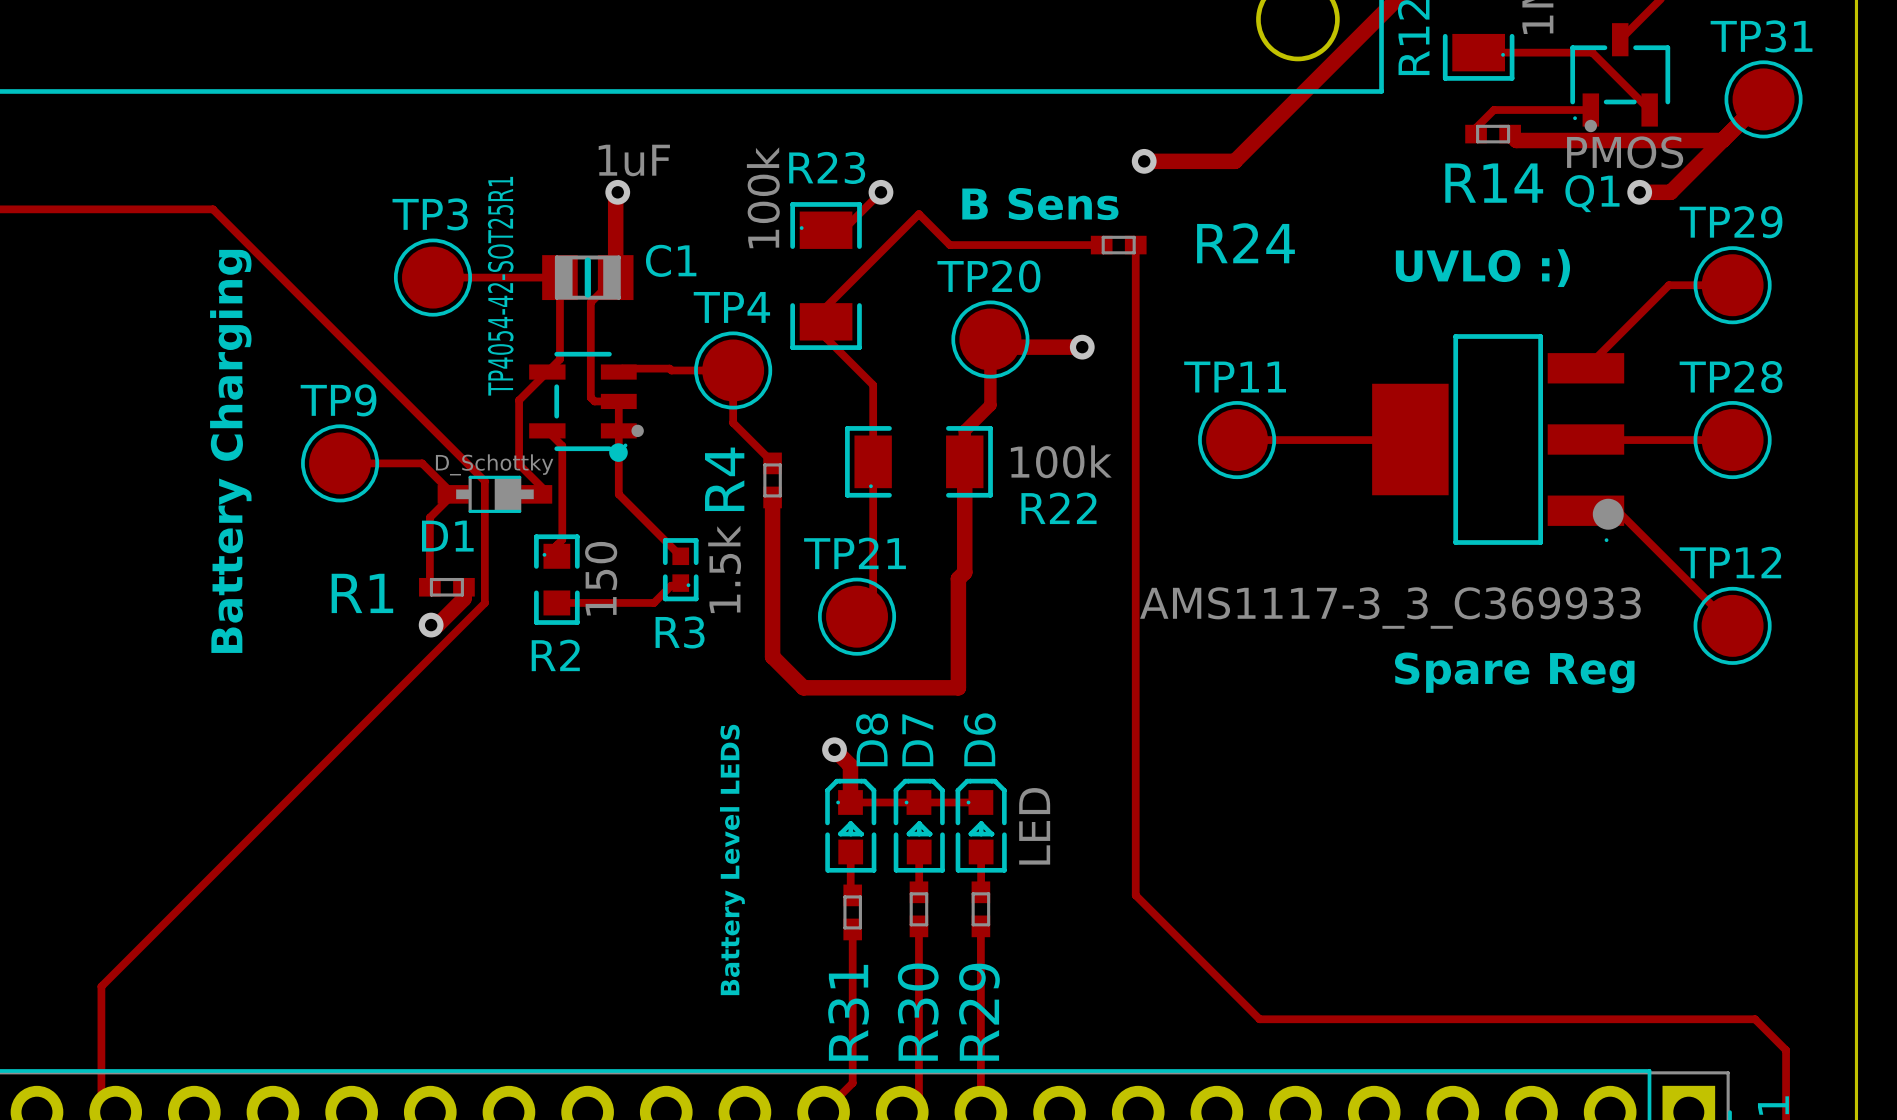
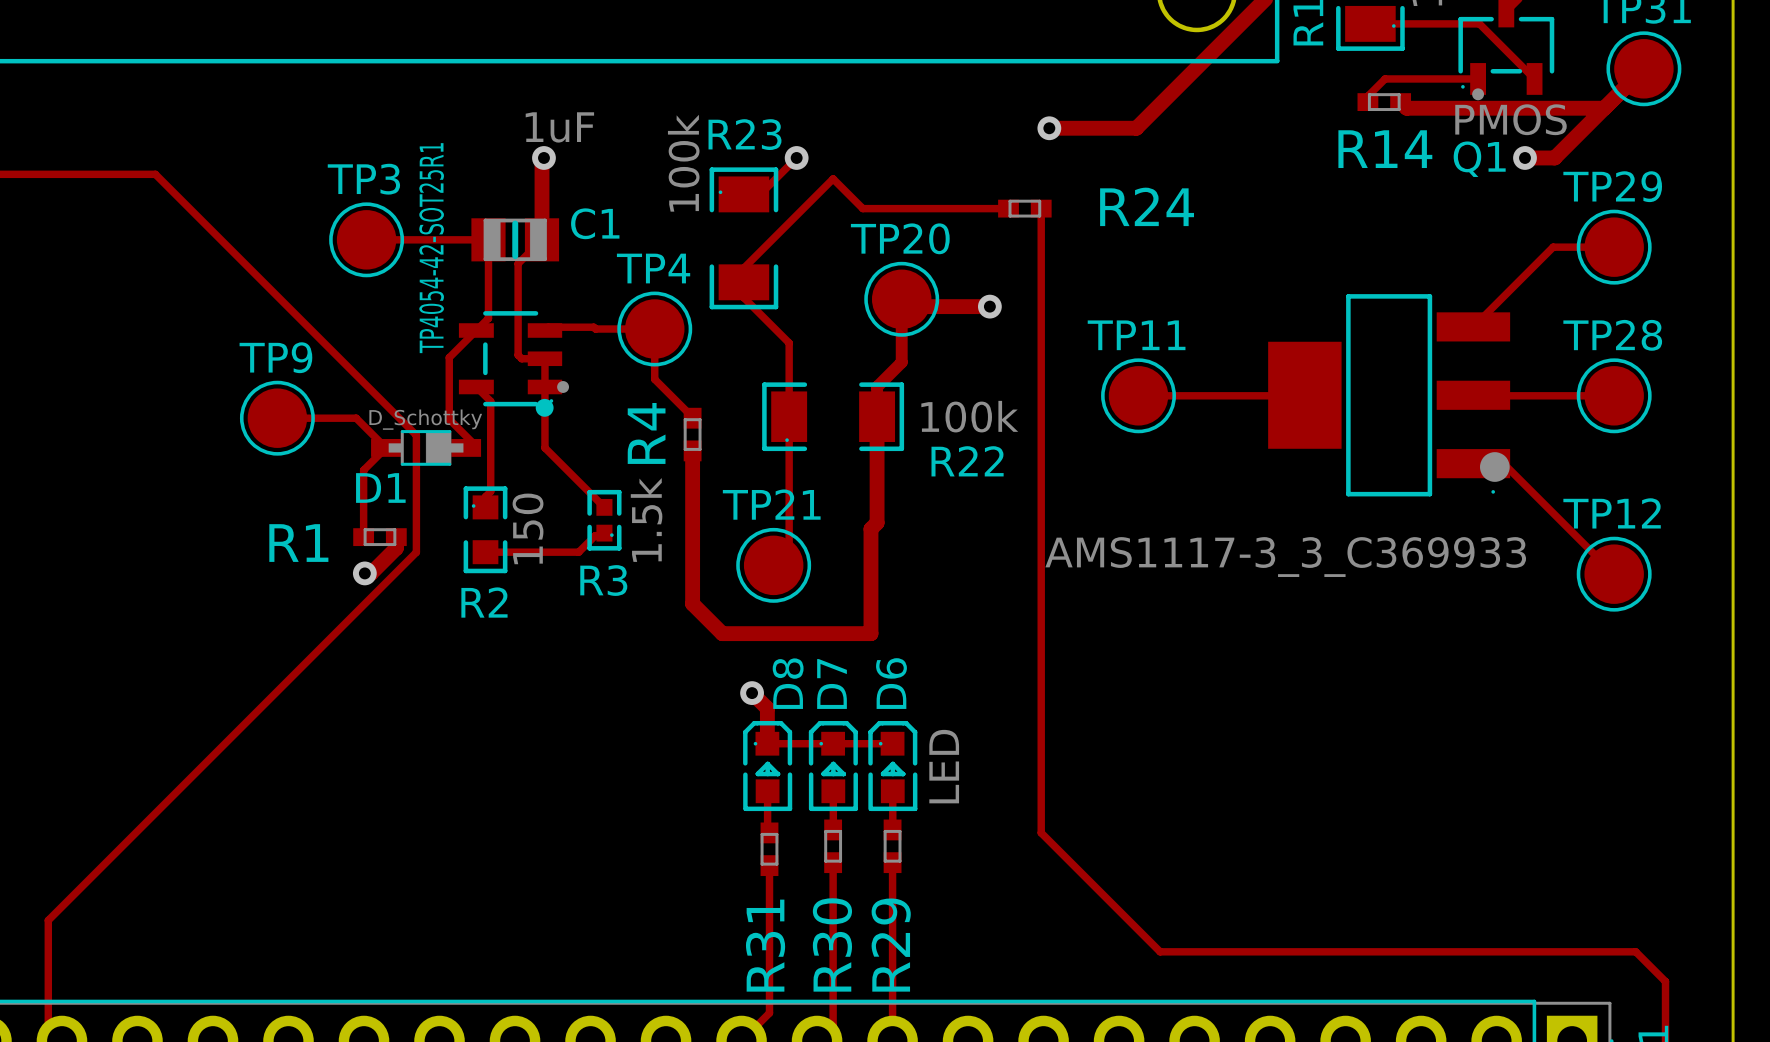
text: B Sens (1040, 204) -> none
text: UVLO :) (1482, 268) -> none
text: Battery Charging (230, 451) -> none
text: Spare Reg (1514, 672) -> none
text: Battery Level LEDS (732, 859) -> none

